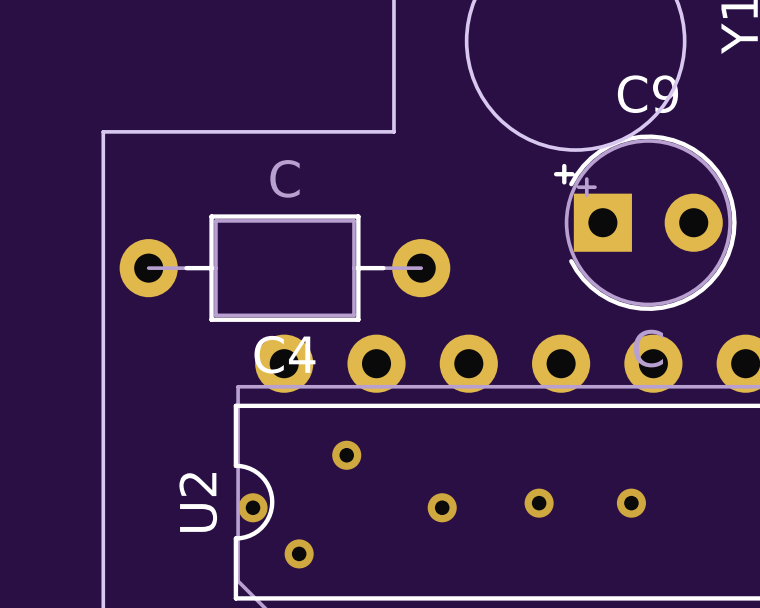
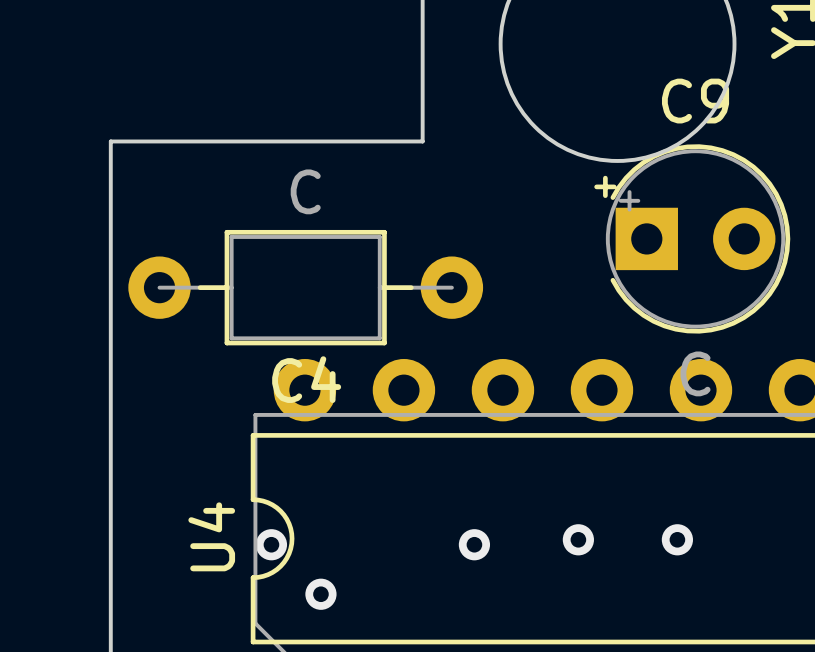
via: (346, 455) -> none
U2 name: U2 (198, 502) -> U4 (211, 536)

